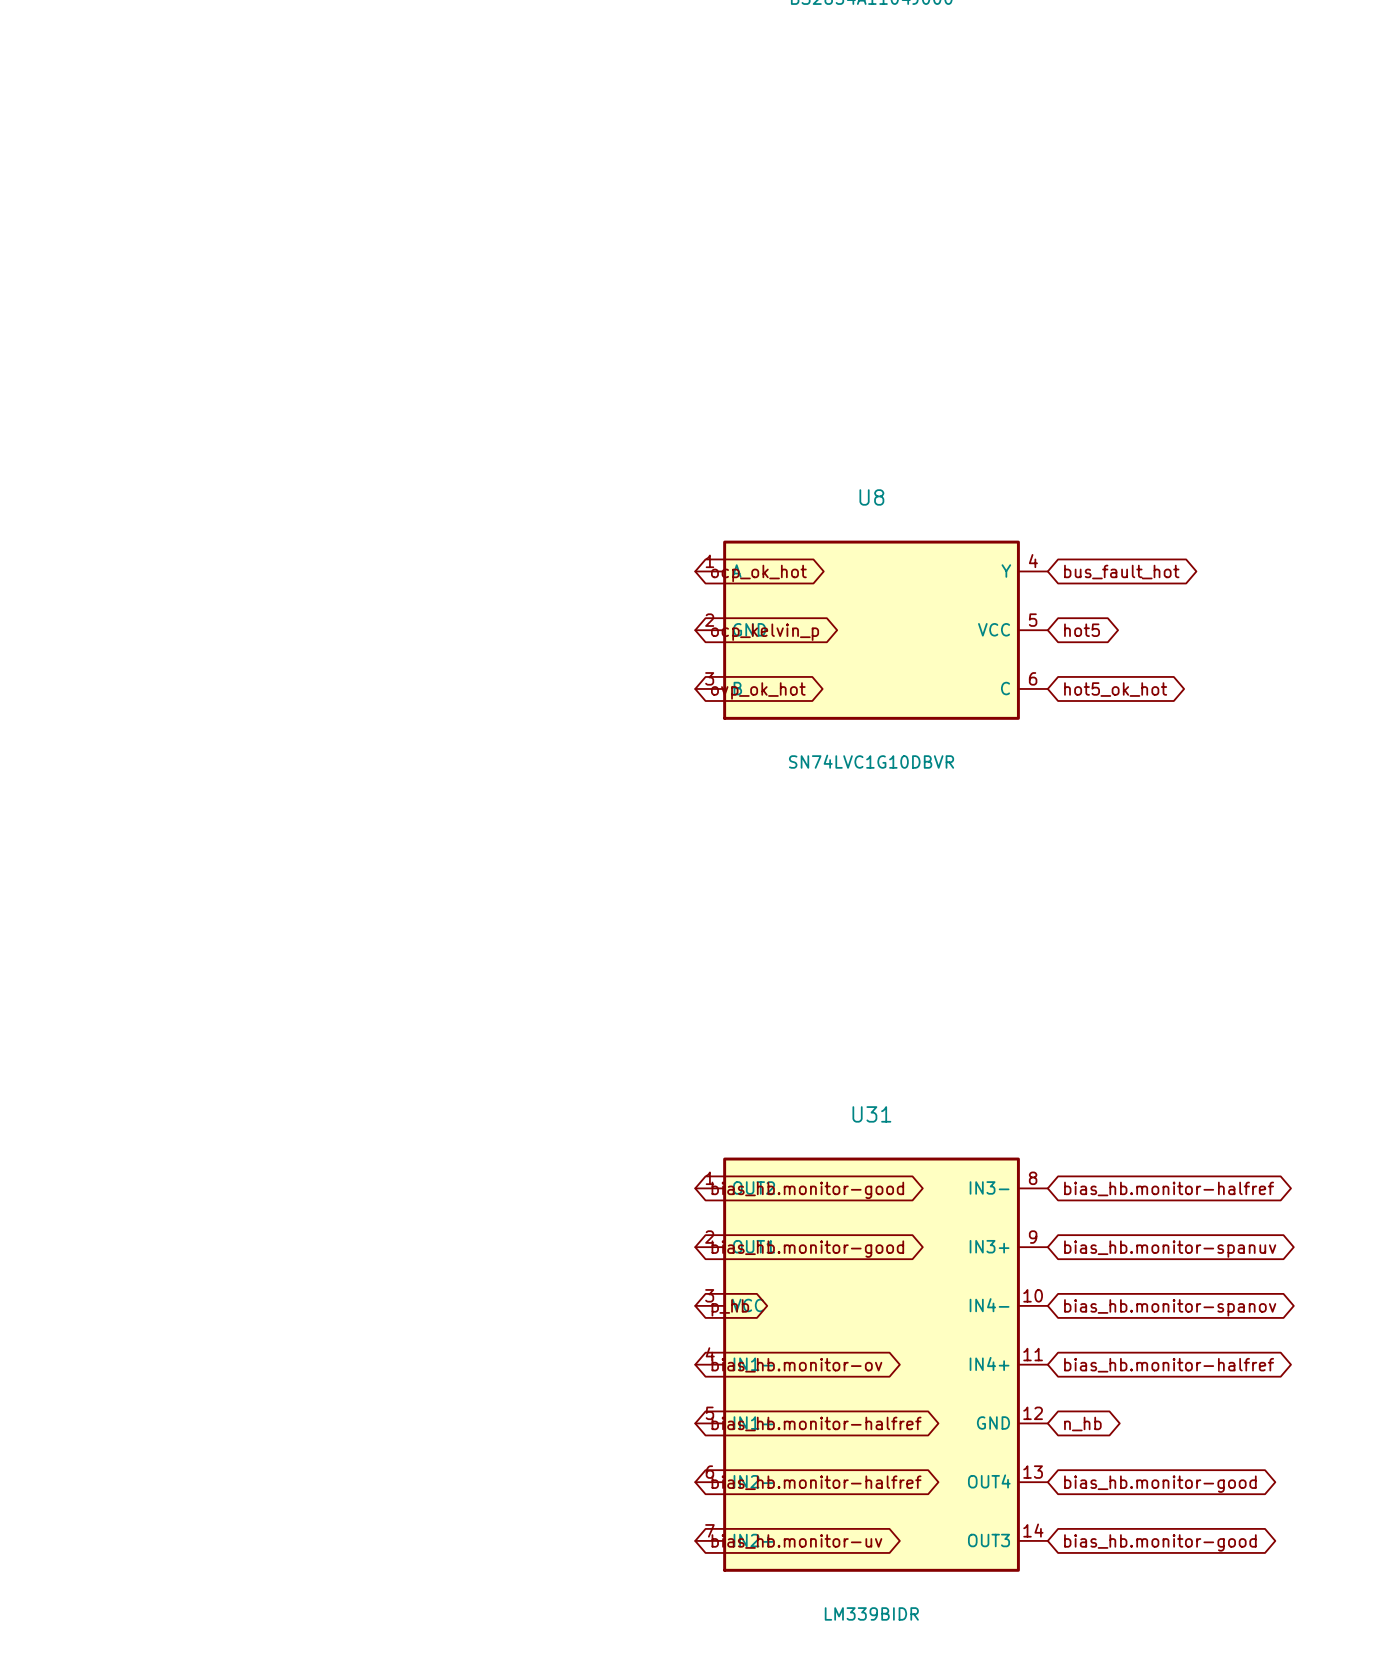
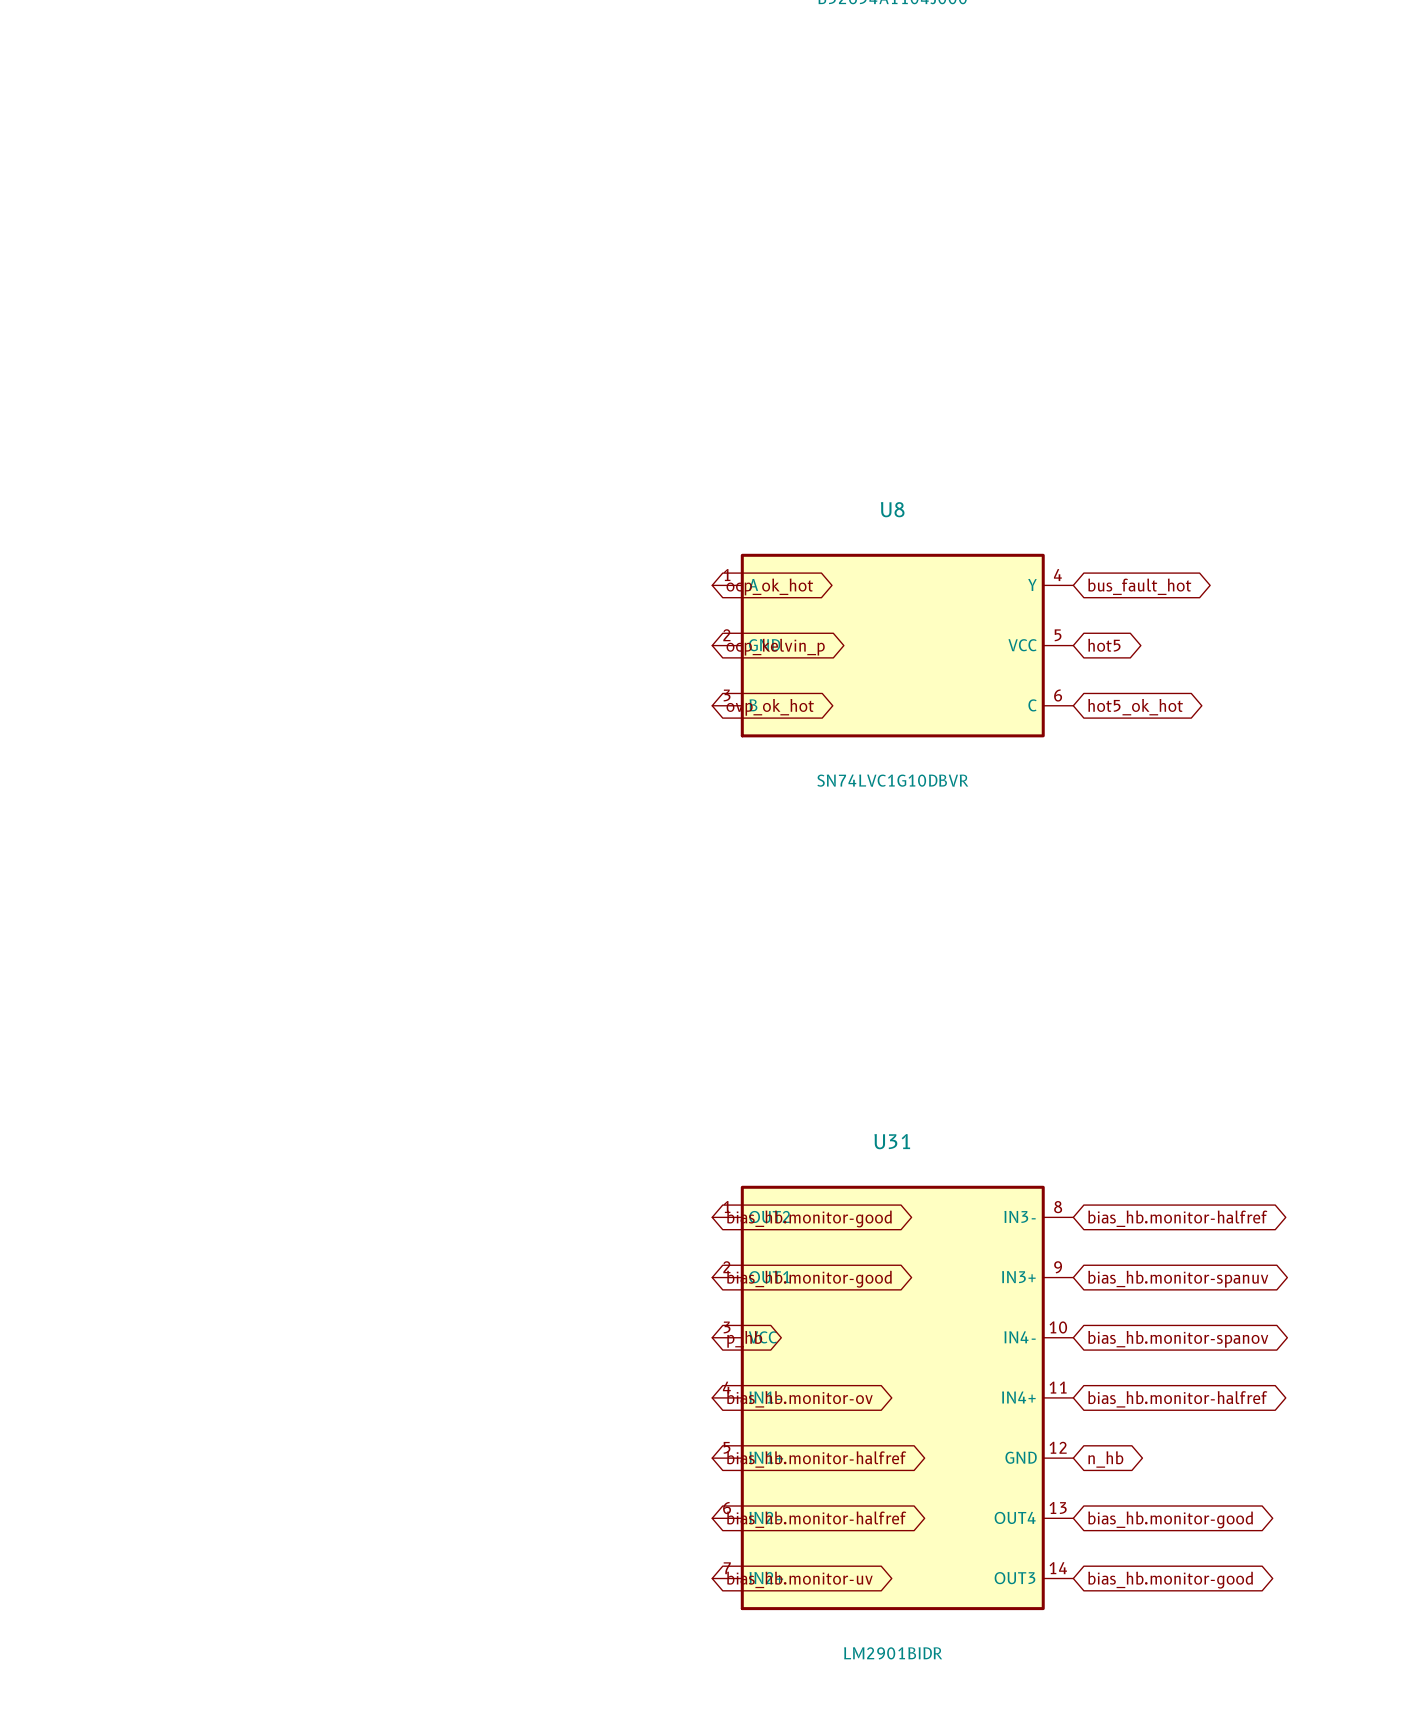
U31 value: LM339BIDR (871, 1613) -> LM2901BIDR (893, 1653)

